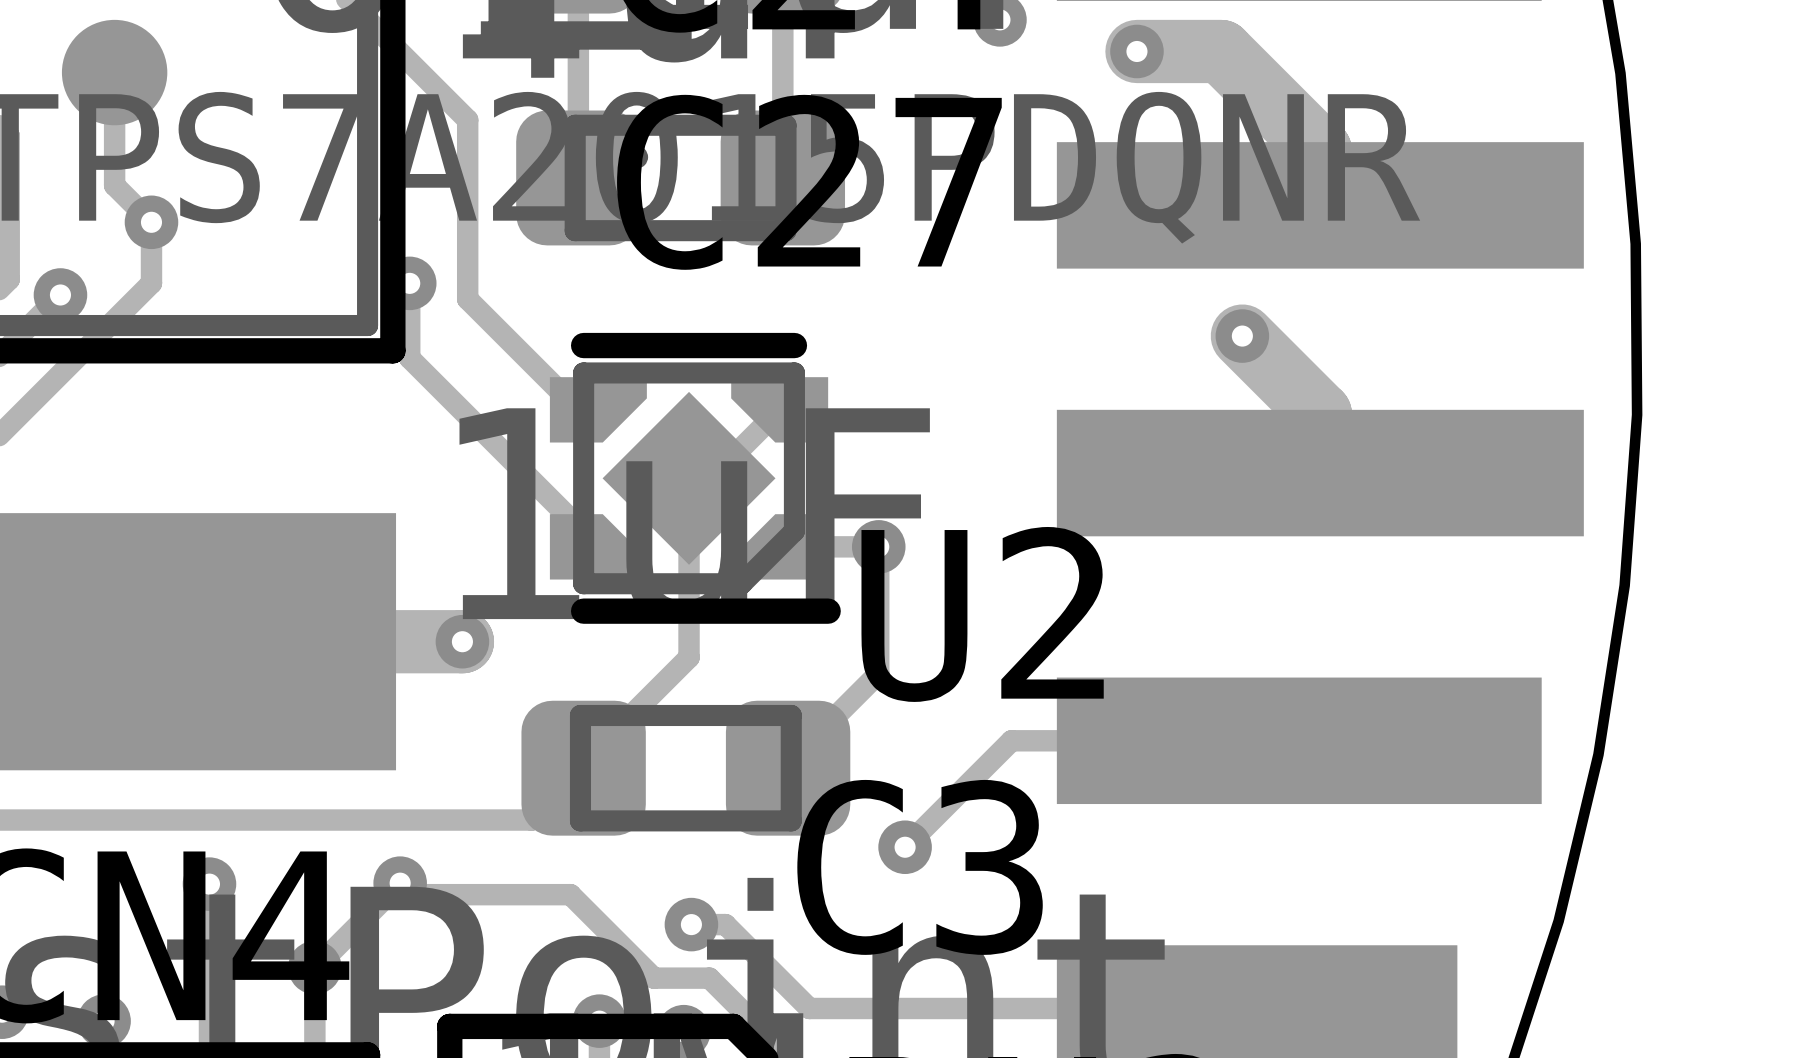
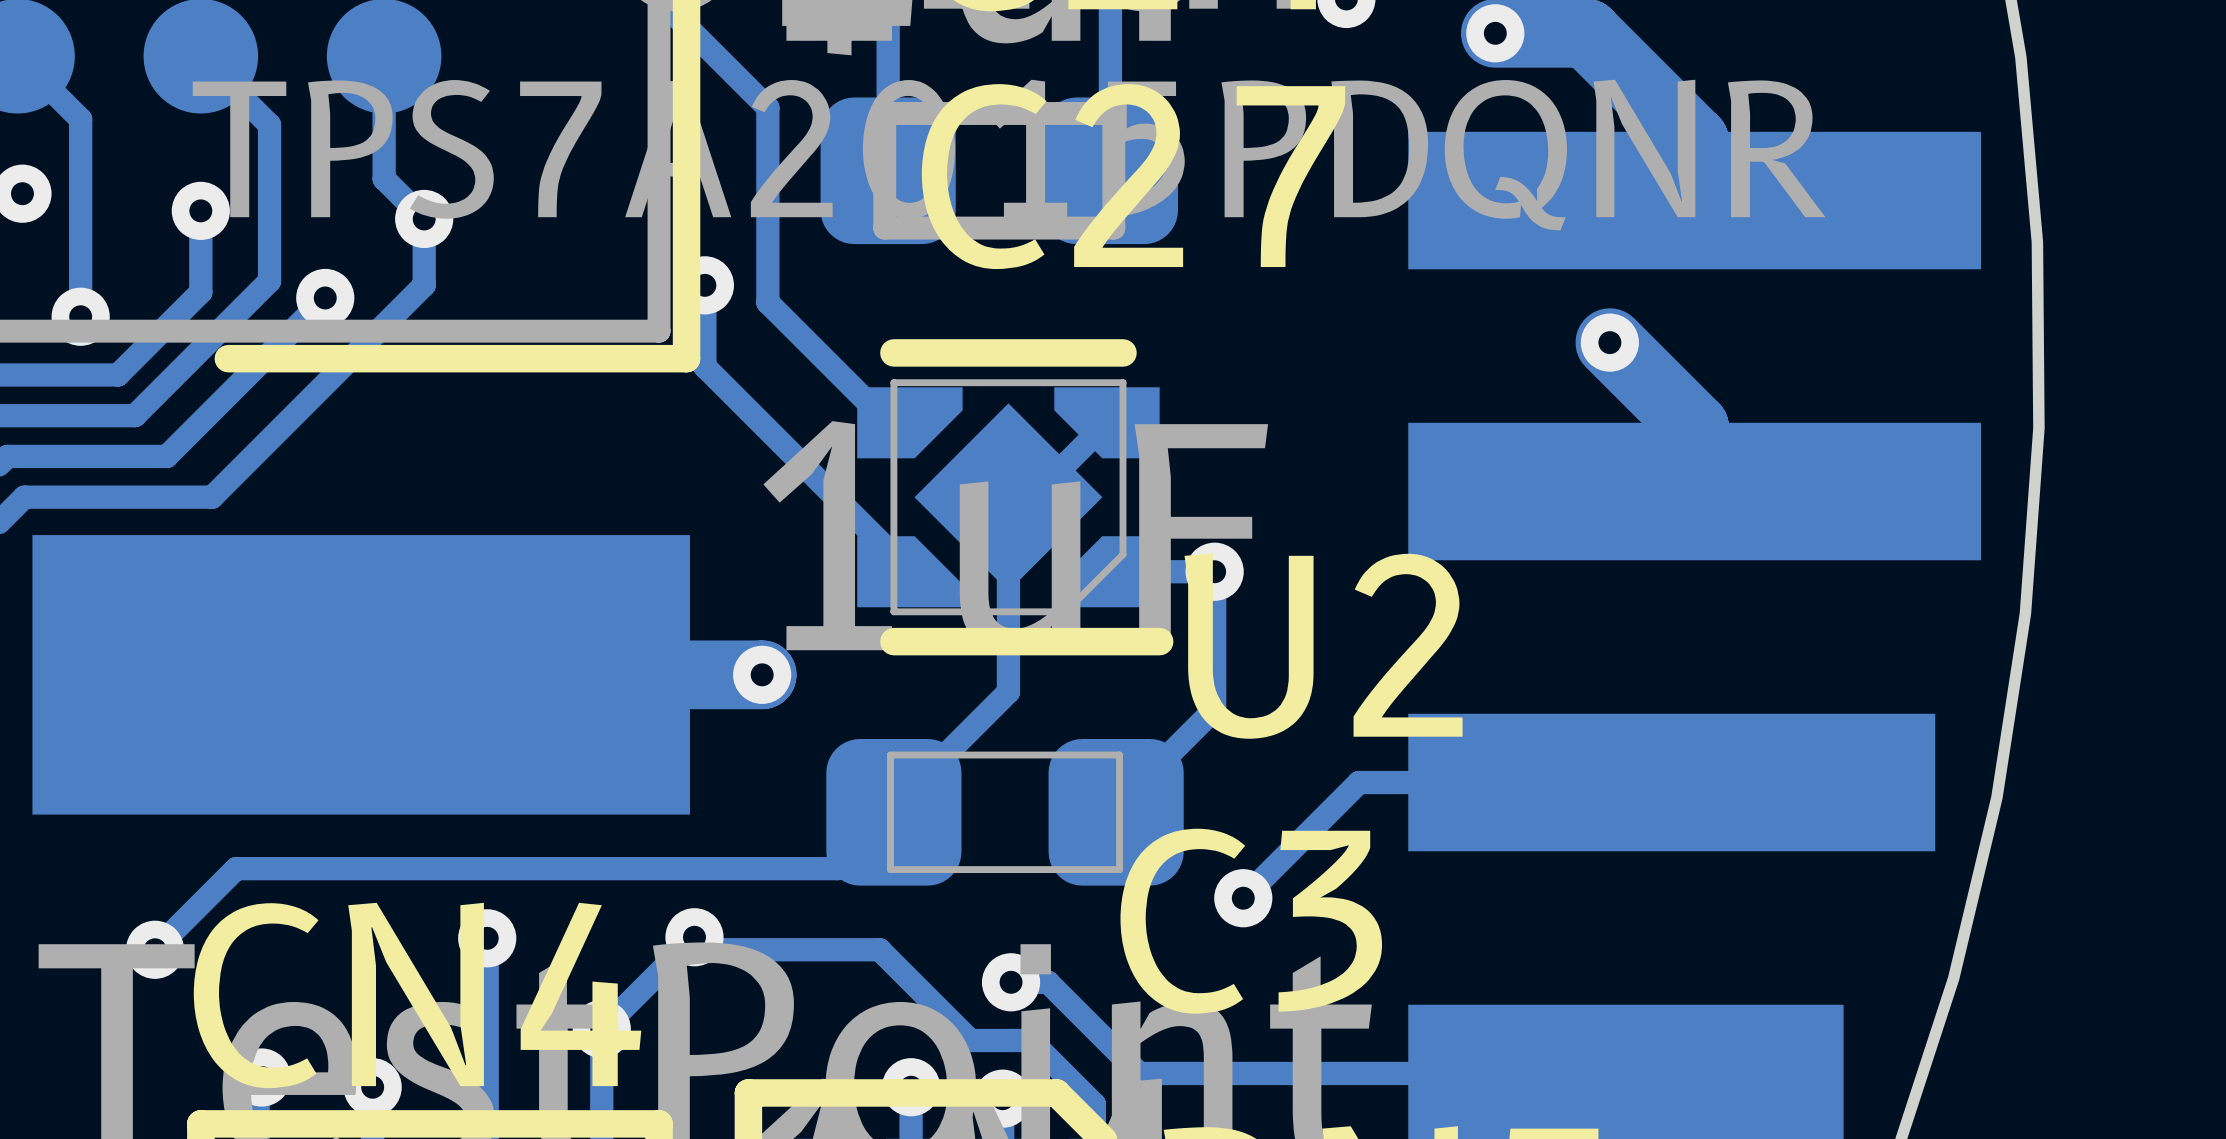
U2 footprint: [549, 332, 841, 624] -> [857, 339, 1174, 656]
C3 footprint: [521, 700, 851, 836] -> [826, 738, 1184, 886]

